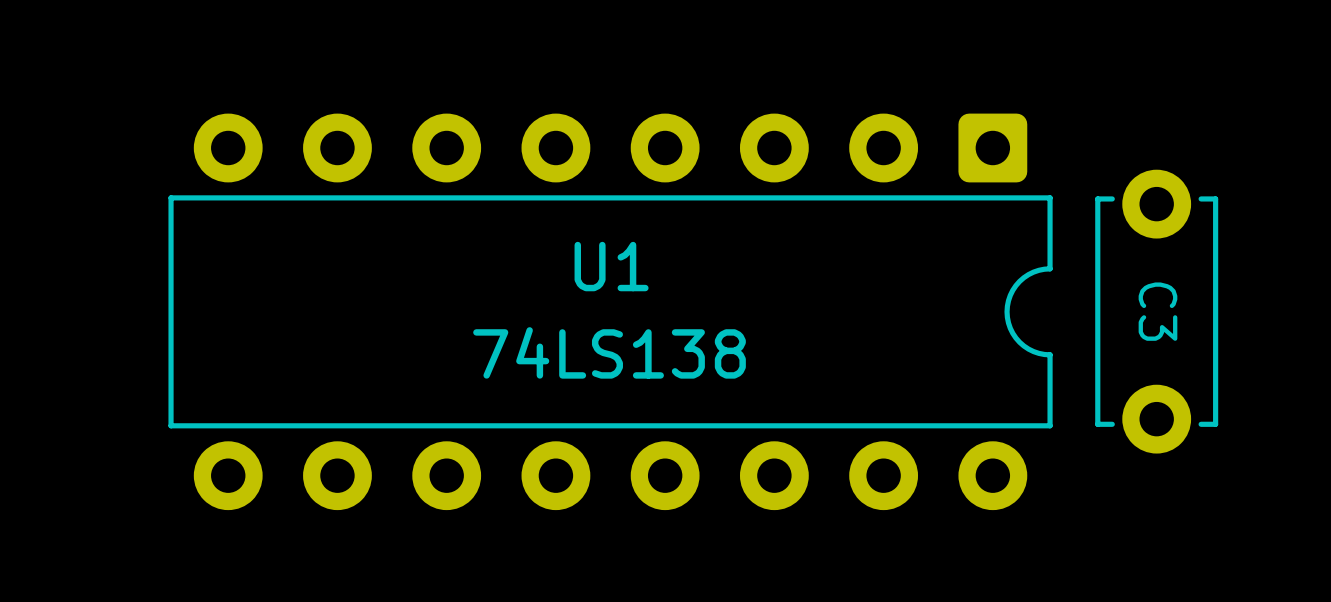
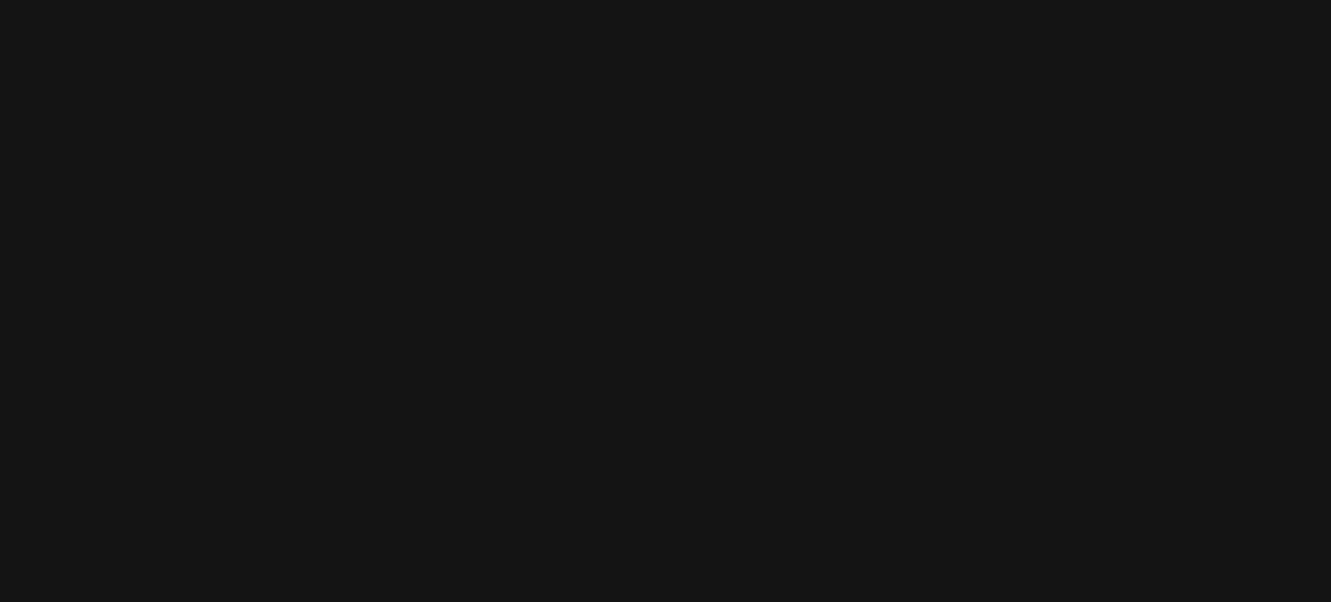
U1: 74LS138 (610, 311) -> none
C3: (1156, 311) -> none

